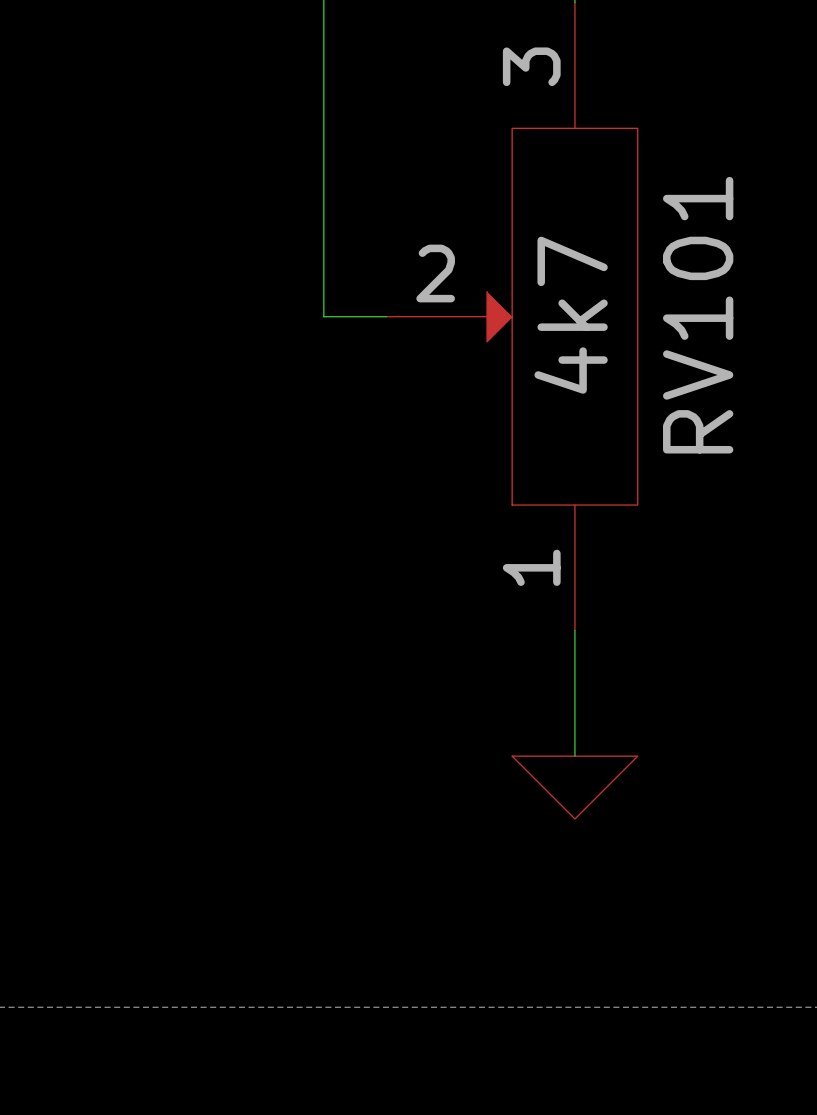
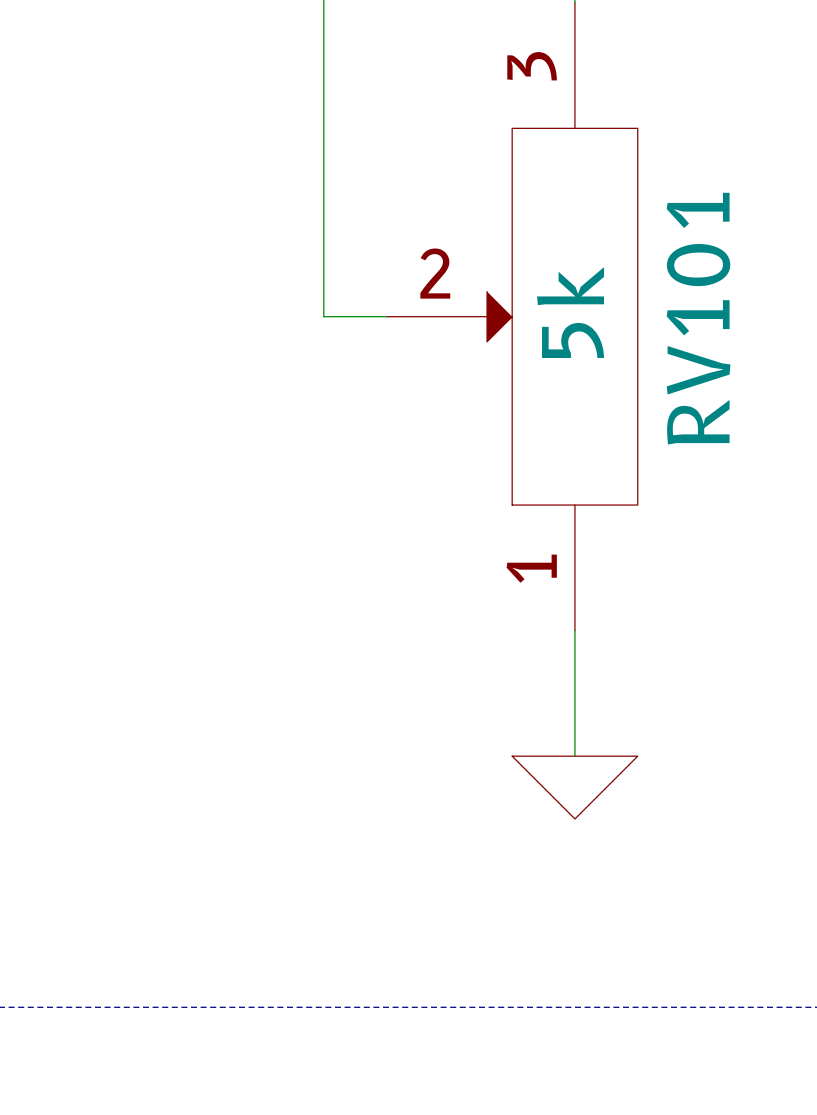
RV101 value: 4k7 (571, 315) -> 5k (570, 312)

